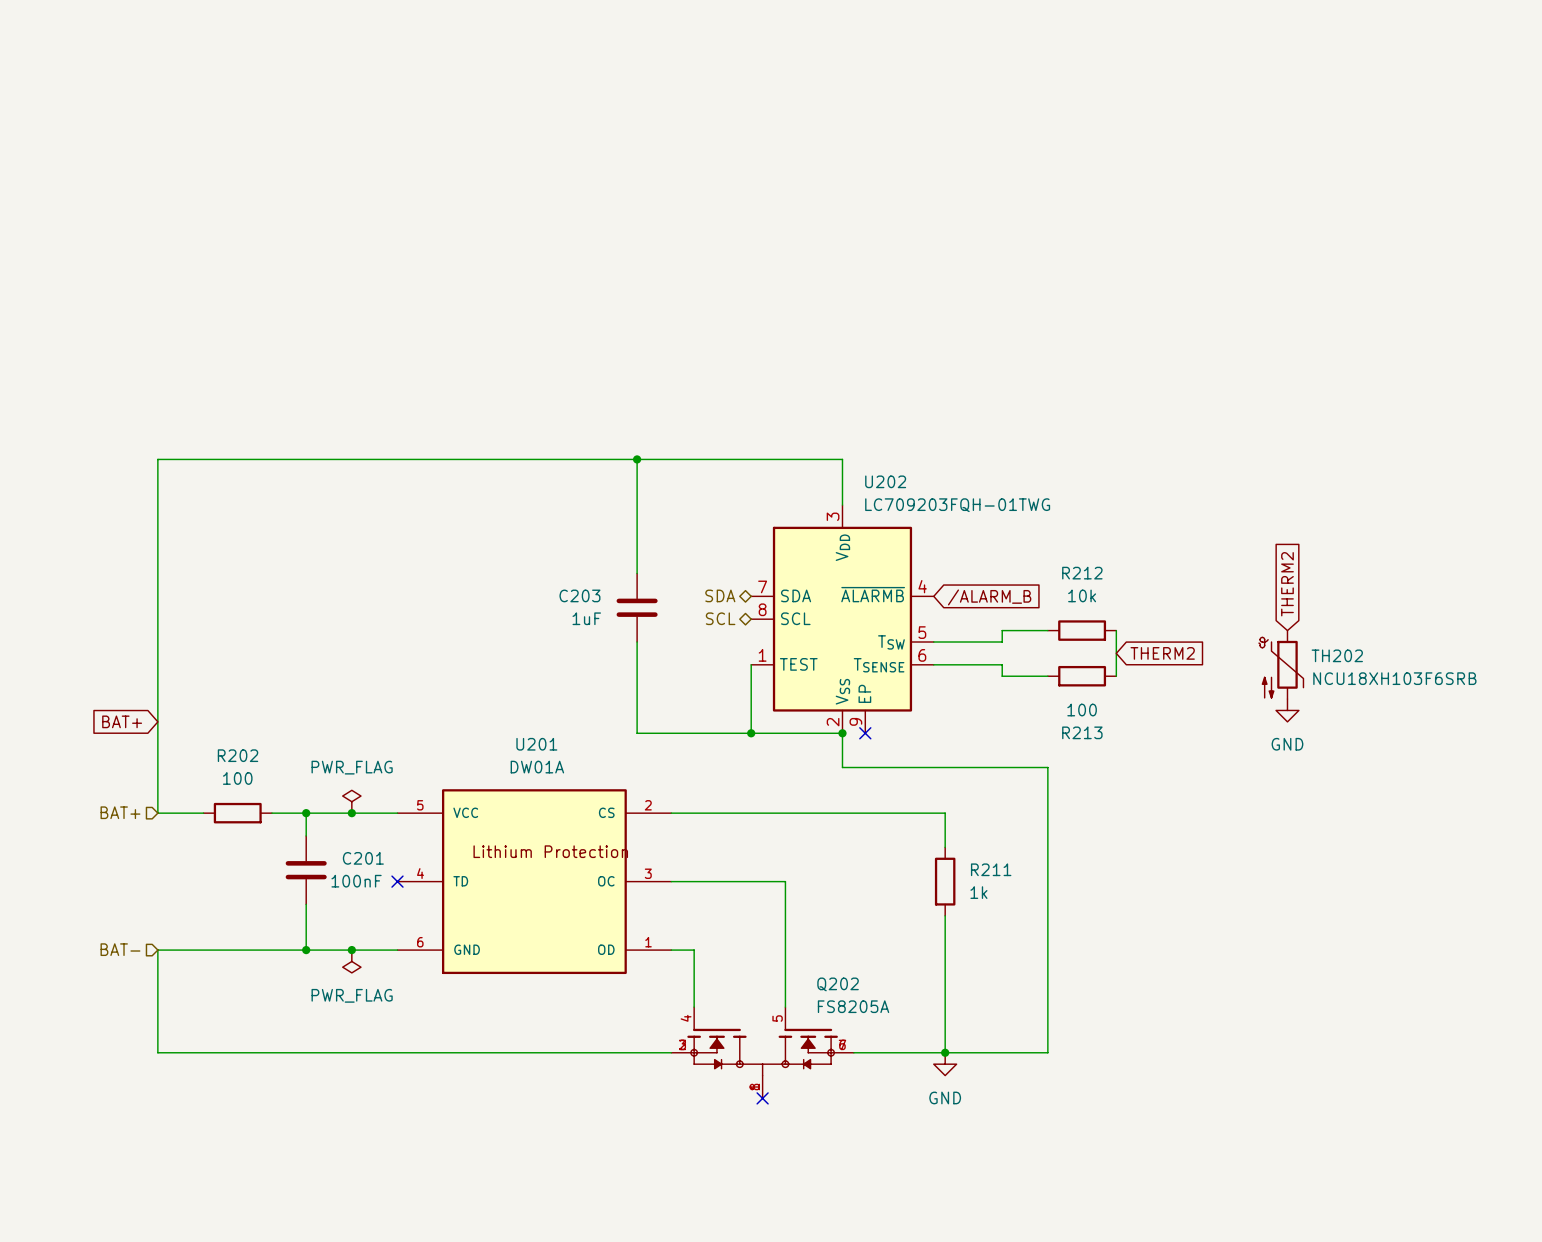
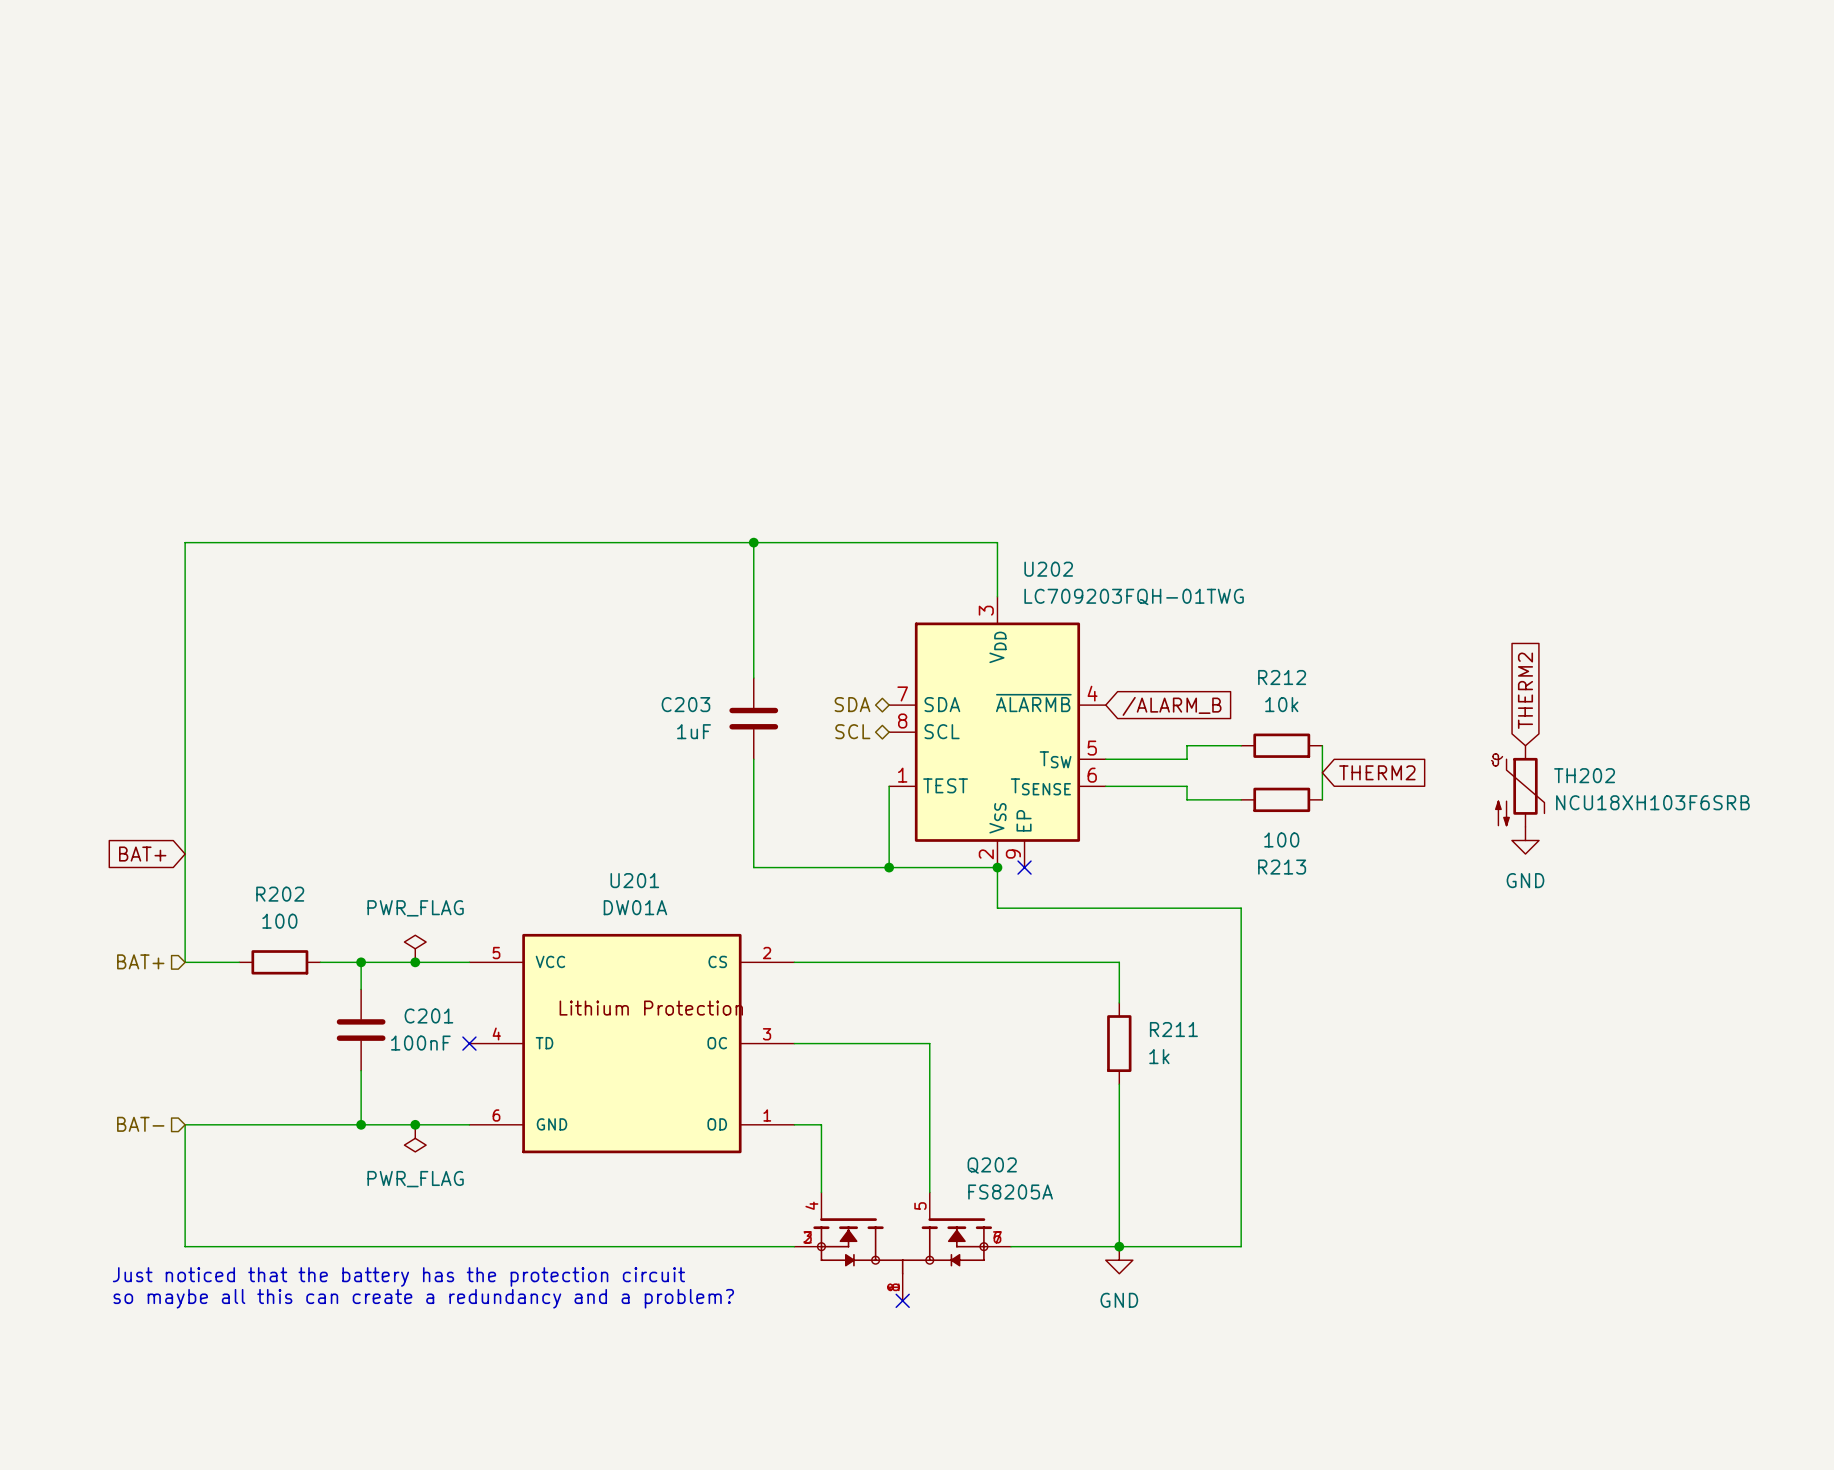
text: none -> Just noticed that the battery has the protection circuit (398, 1276)
text: none -> so maybe all this can create a redundancy and a problem? (423, 1298)

